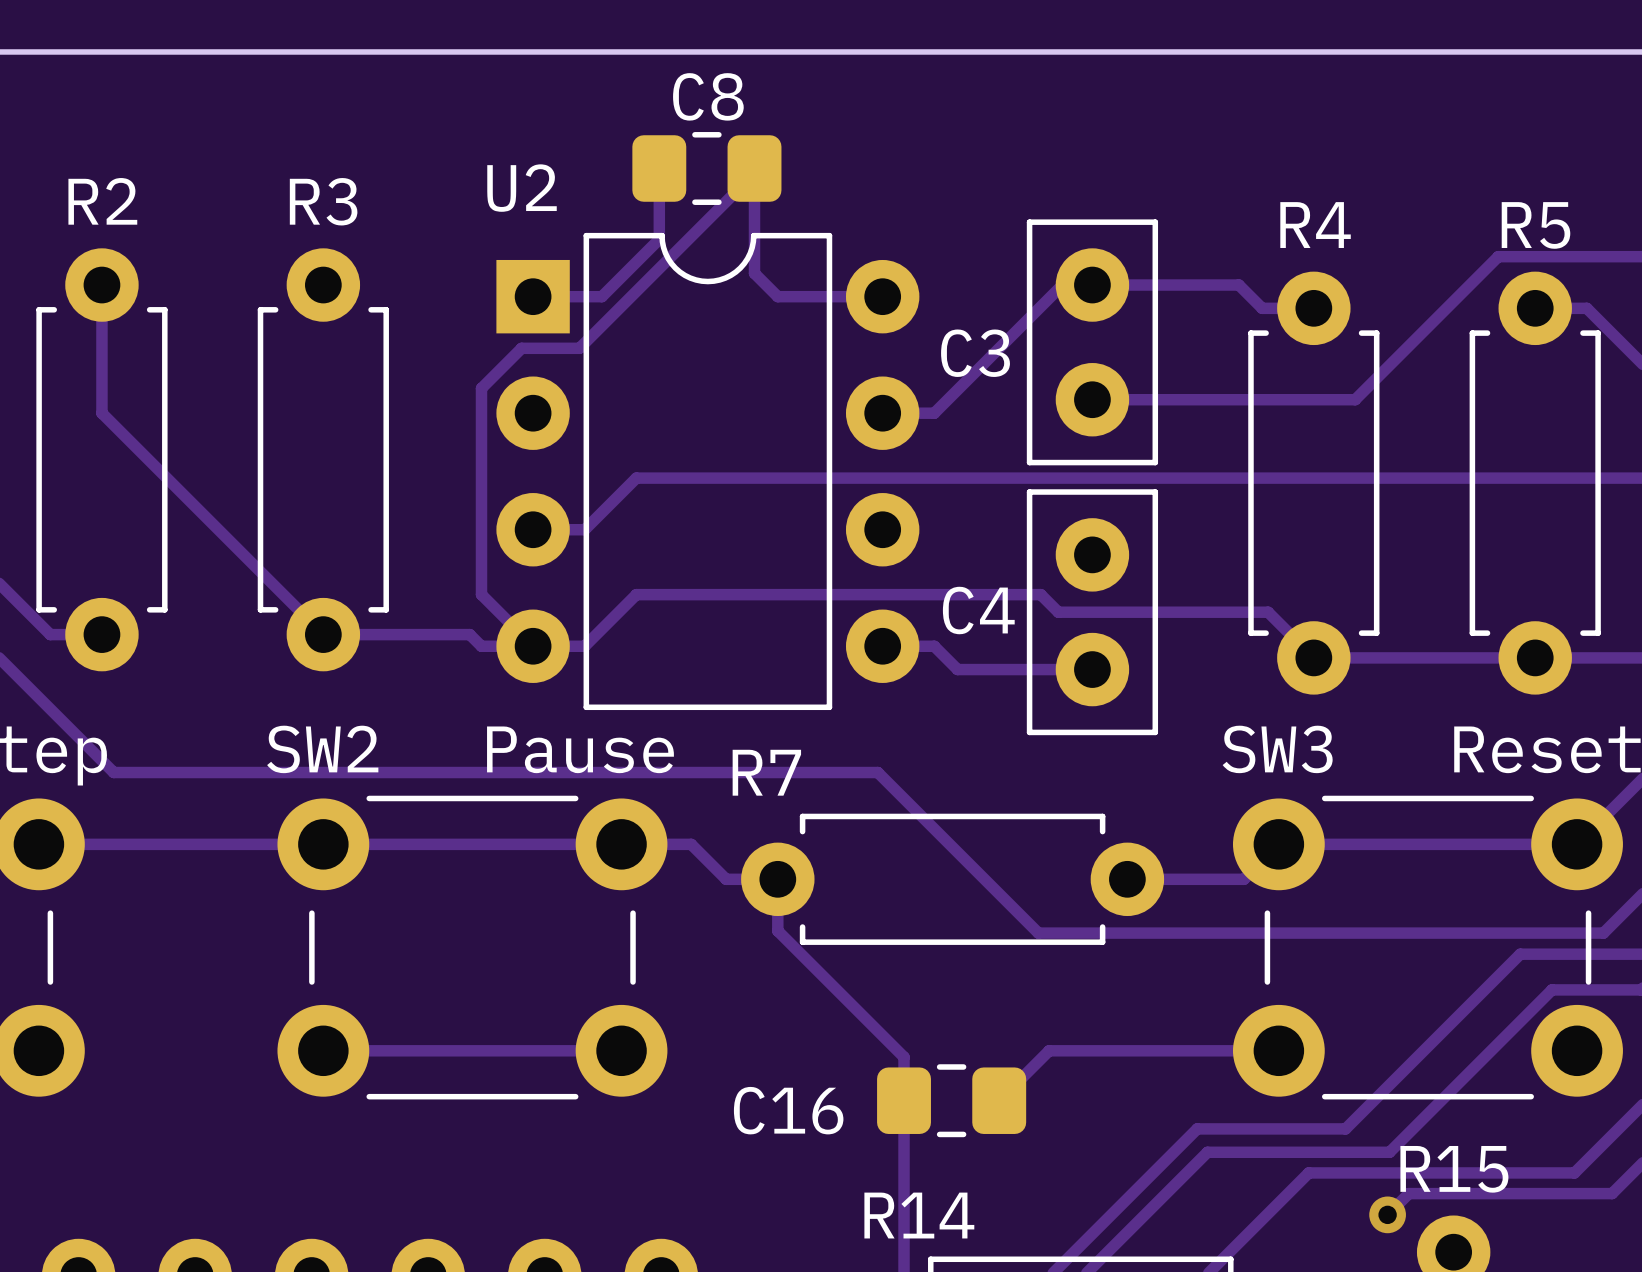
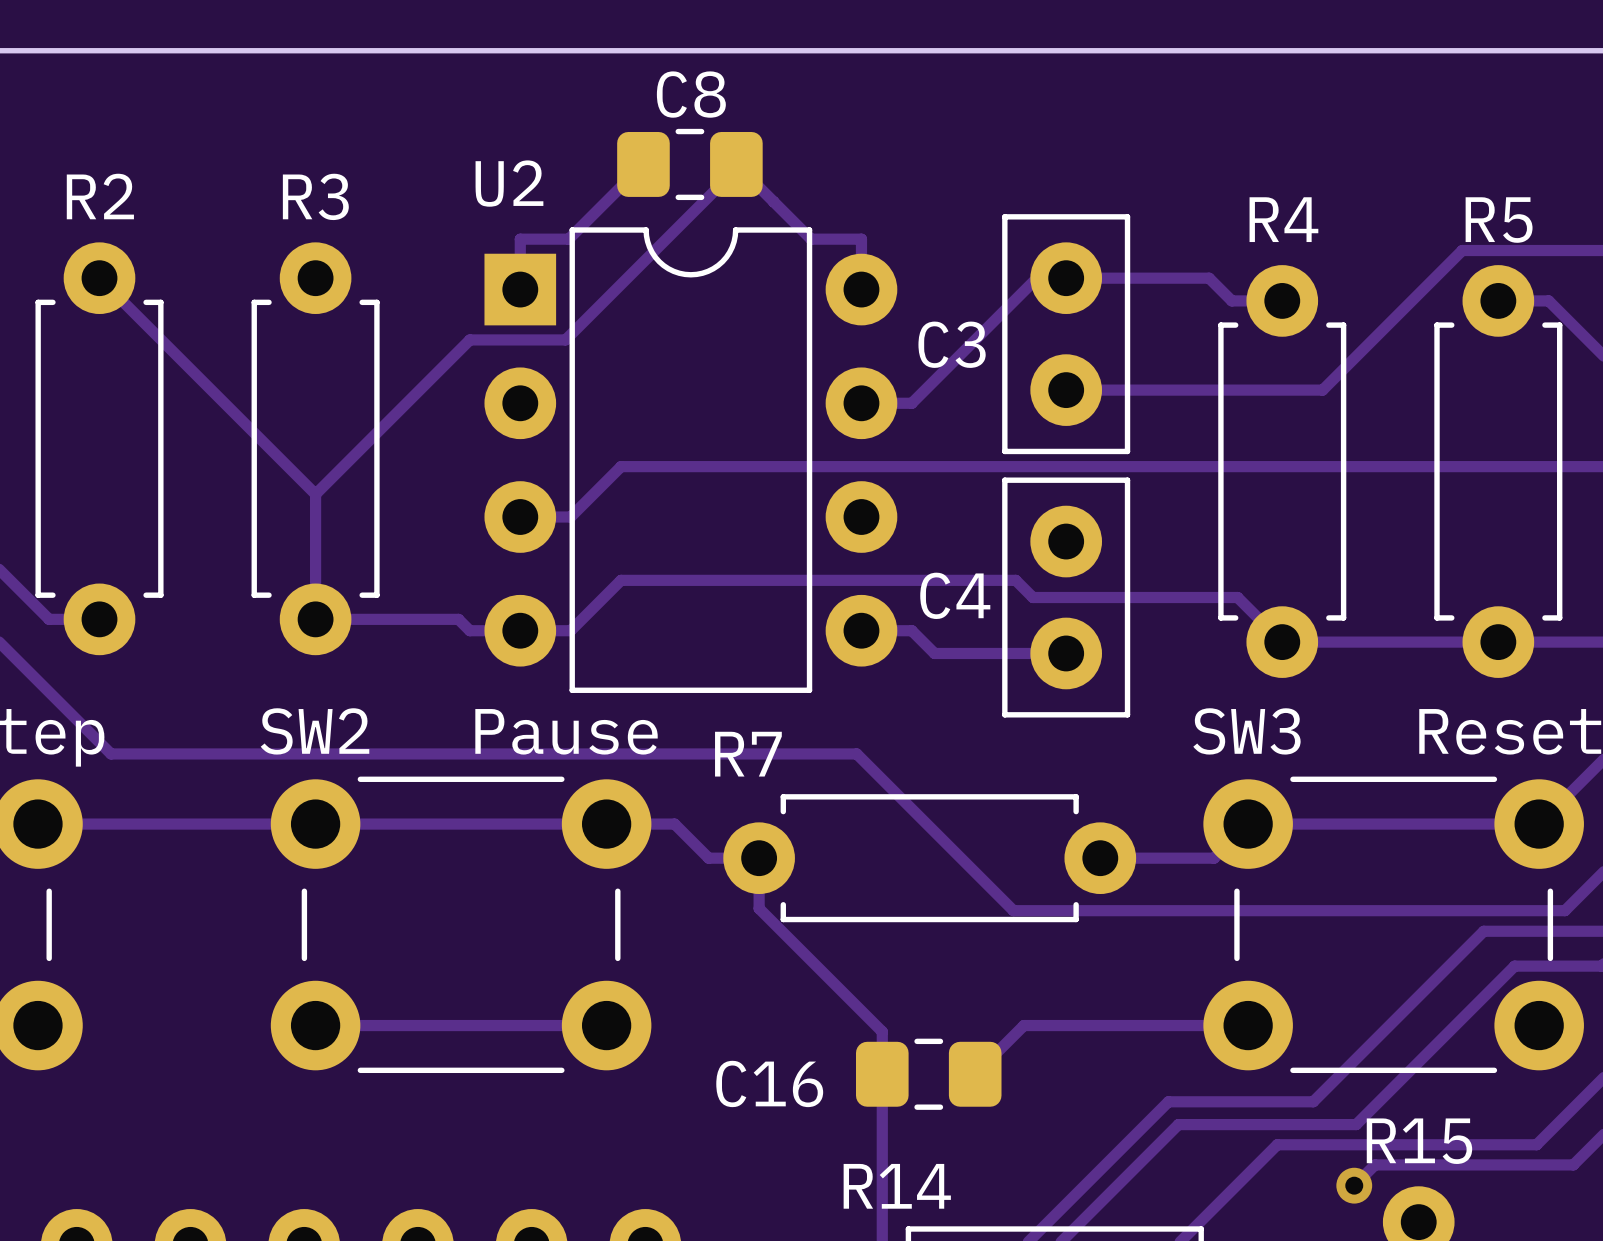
track: (659, 168) (659, 239) (601, 296) (533, 296) -> (643, 164) (568, 239) (520, 239) (520, 289)
track: (754, 168) (754, 273) (777, 296) (882, 296) -> (738, 166) (811, 239) (861, 239) (861, 289)
track: (101, 285) (101, 413) (323, 634) -> (99, 278) (315, 494)
track: (521, 348) (481, 388) (481, 594) (533, 646) -> (509, 339) (469, 339) (315, 494)
track: none -> (315, 494) (315, 619)

